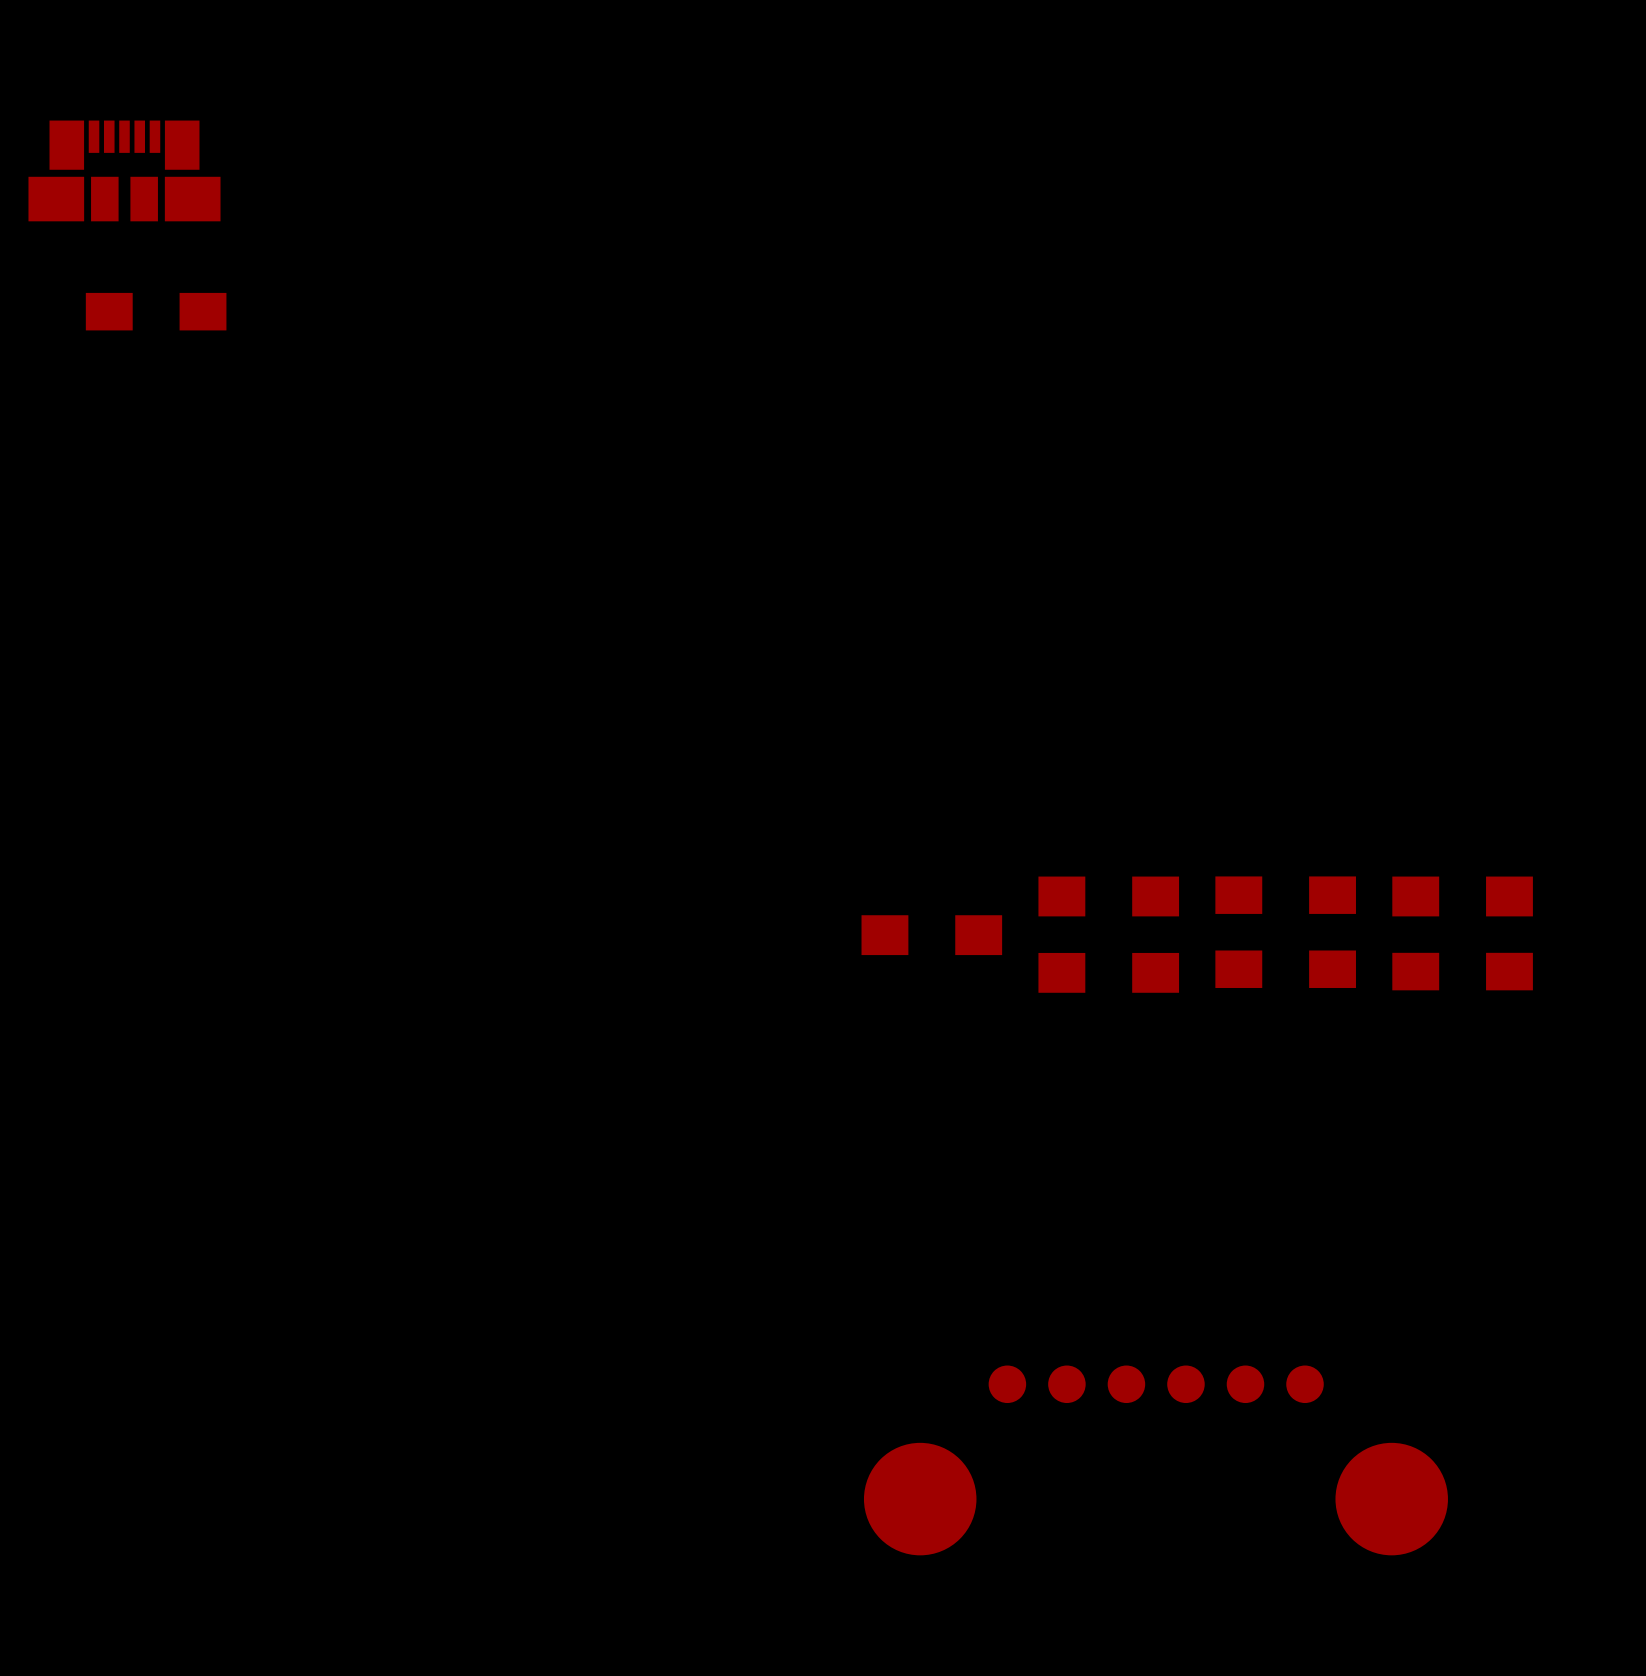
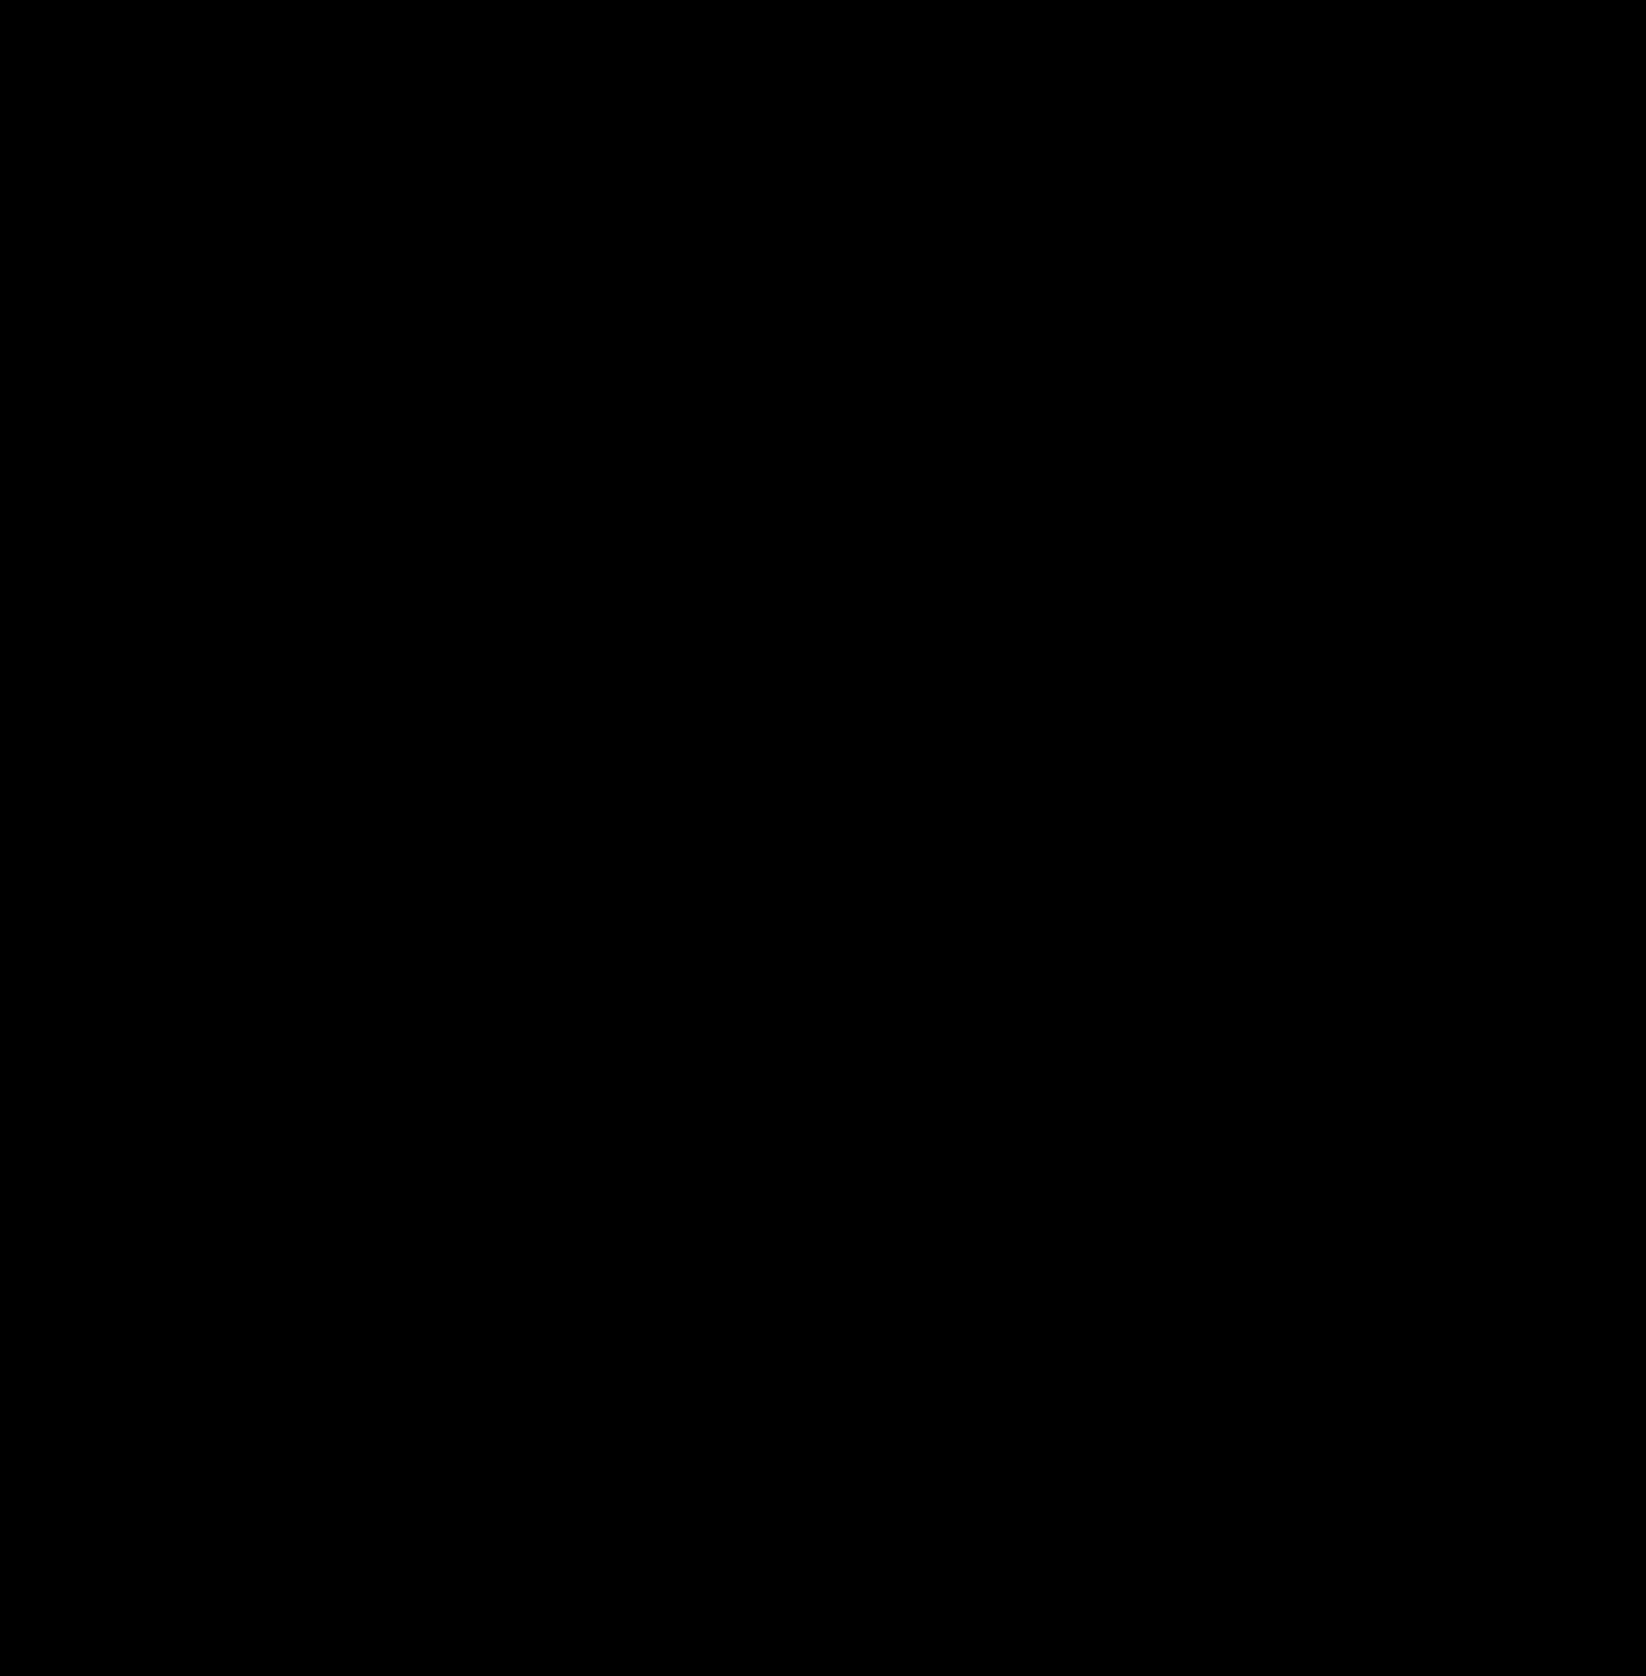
part: (124, 170) -> none
part: (156, 311) -> none
part: (1285, 895) -> none
part: (1108, 896) -> none
part: (1462, 896) -> none
part: (931, 935) -> none
part: (1285, 969) -> none
part: (1462, 971) -> none
part: (1108, 972) -> none
part: (1155, 1460) -> none

